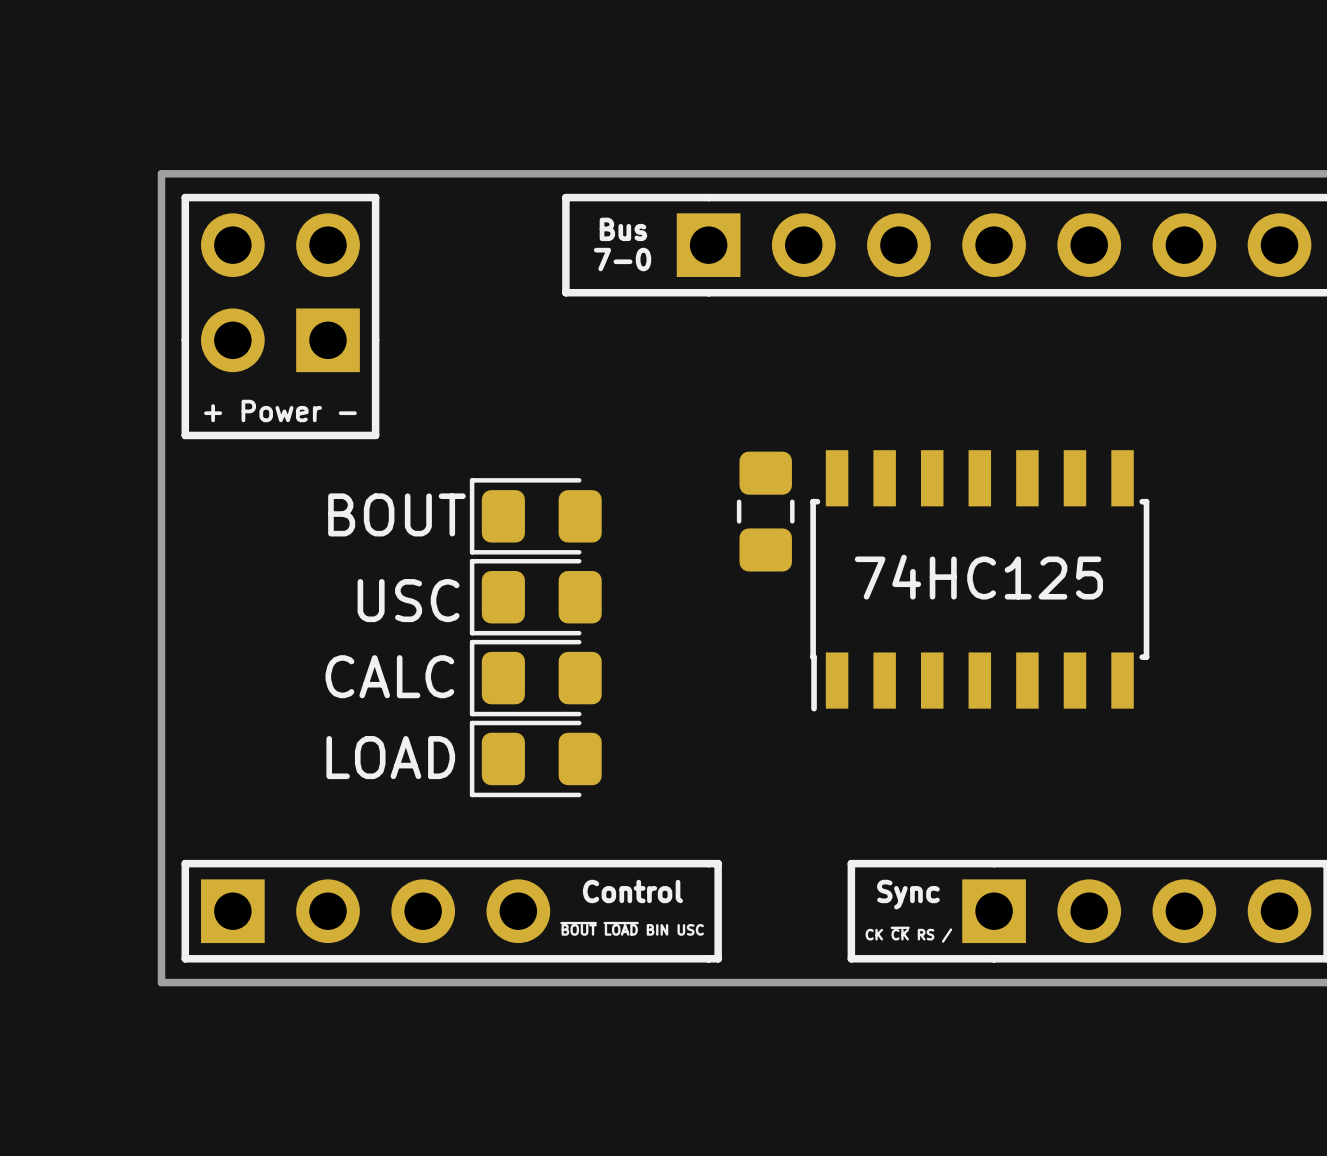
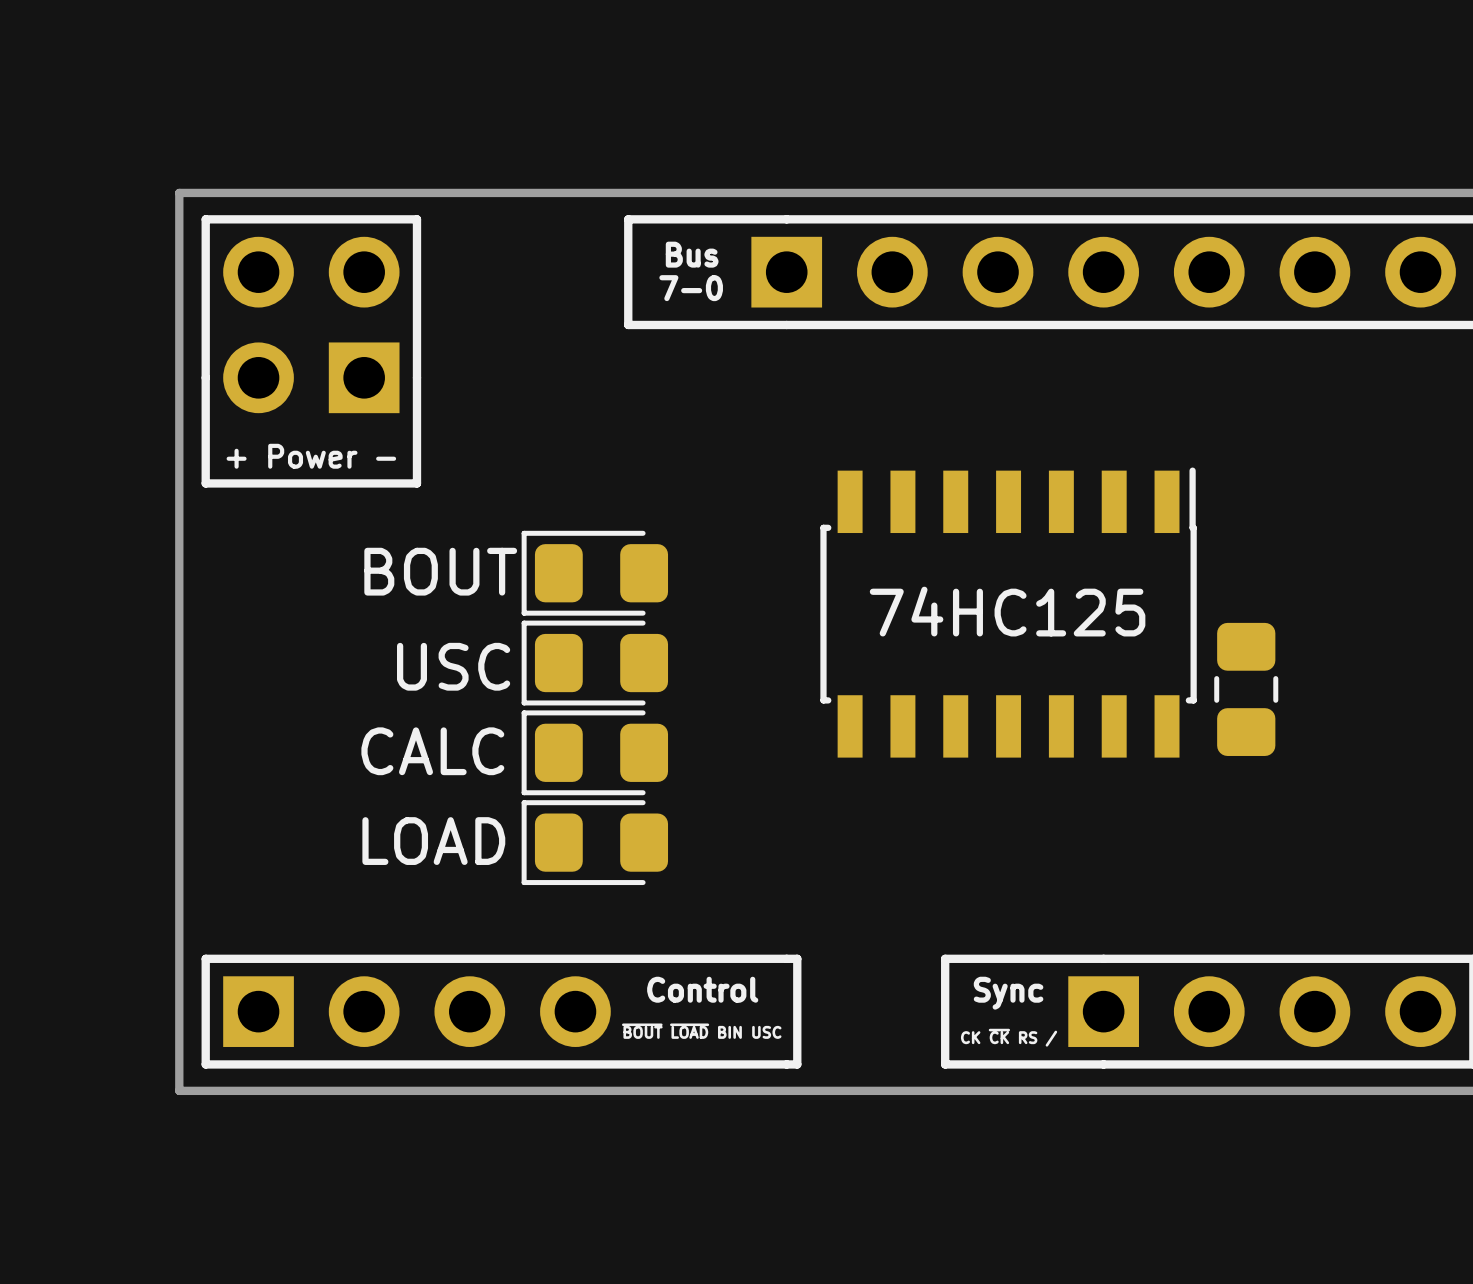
part: (765, 511) -> none
part rotation: 0° (979, 580) -> 180° (1008, 612)
part: none -> (1246, 689)

